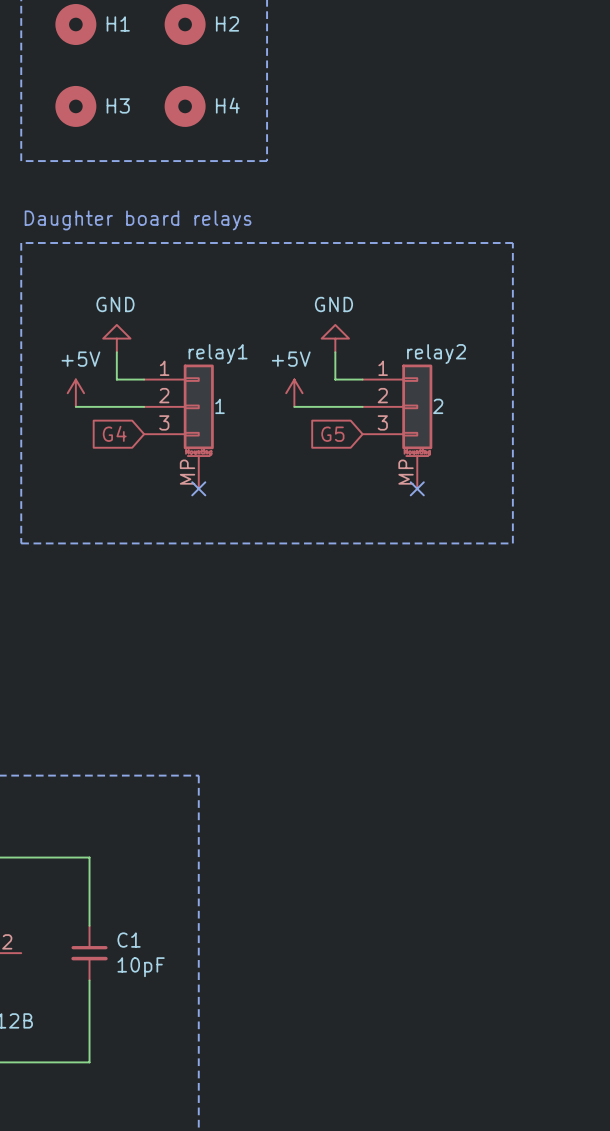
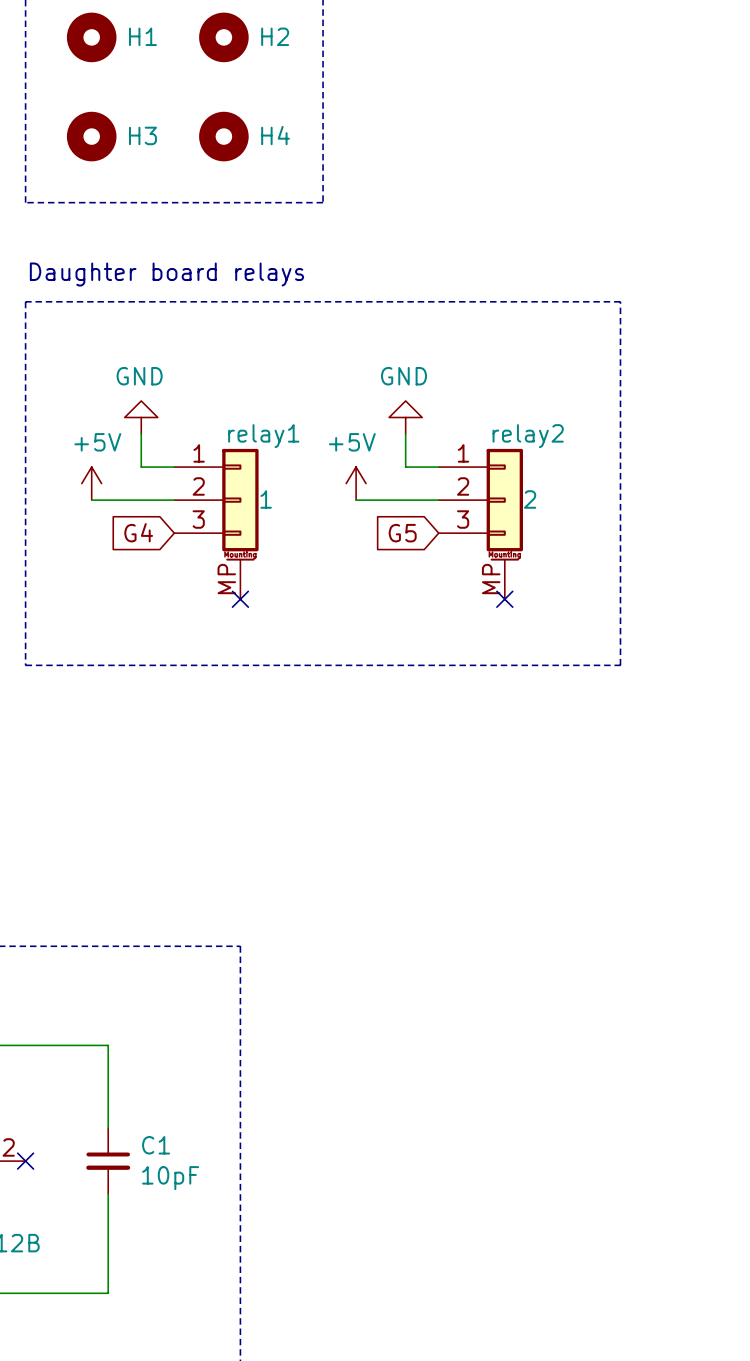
no-connect mark: none -> (25, 1161)

